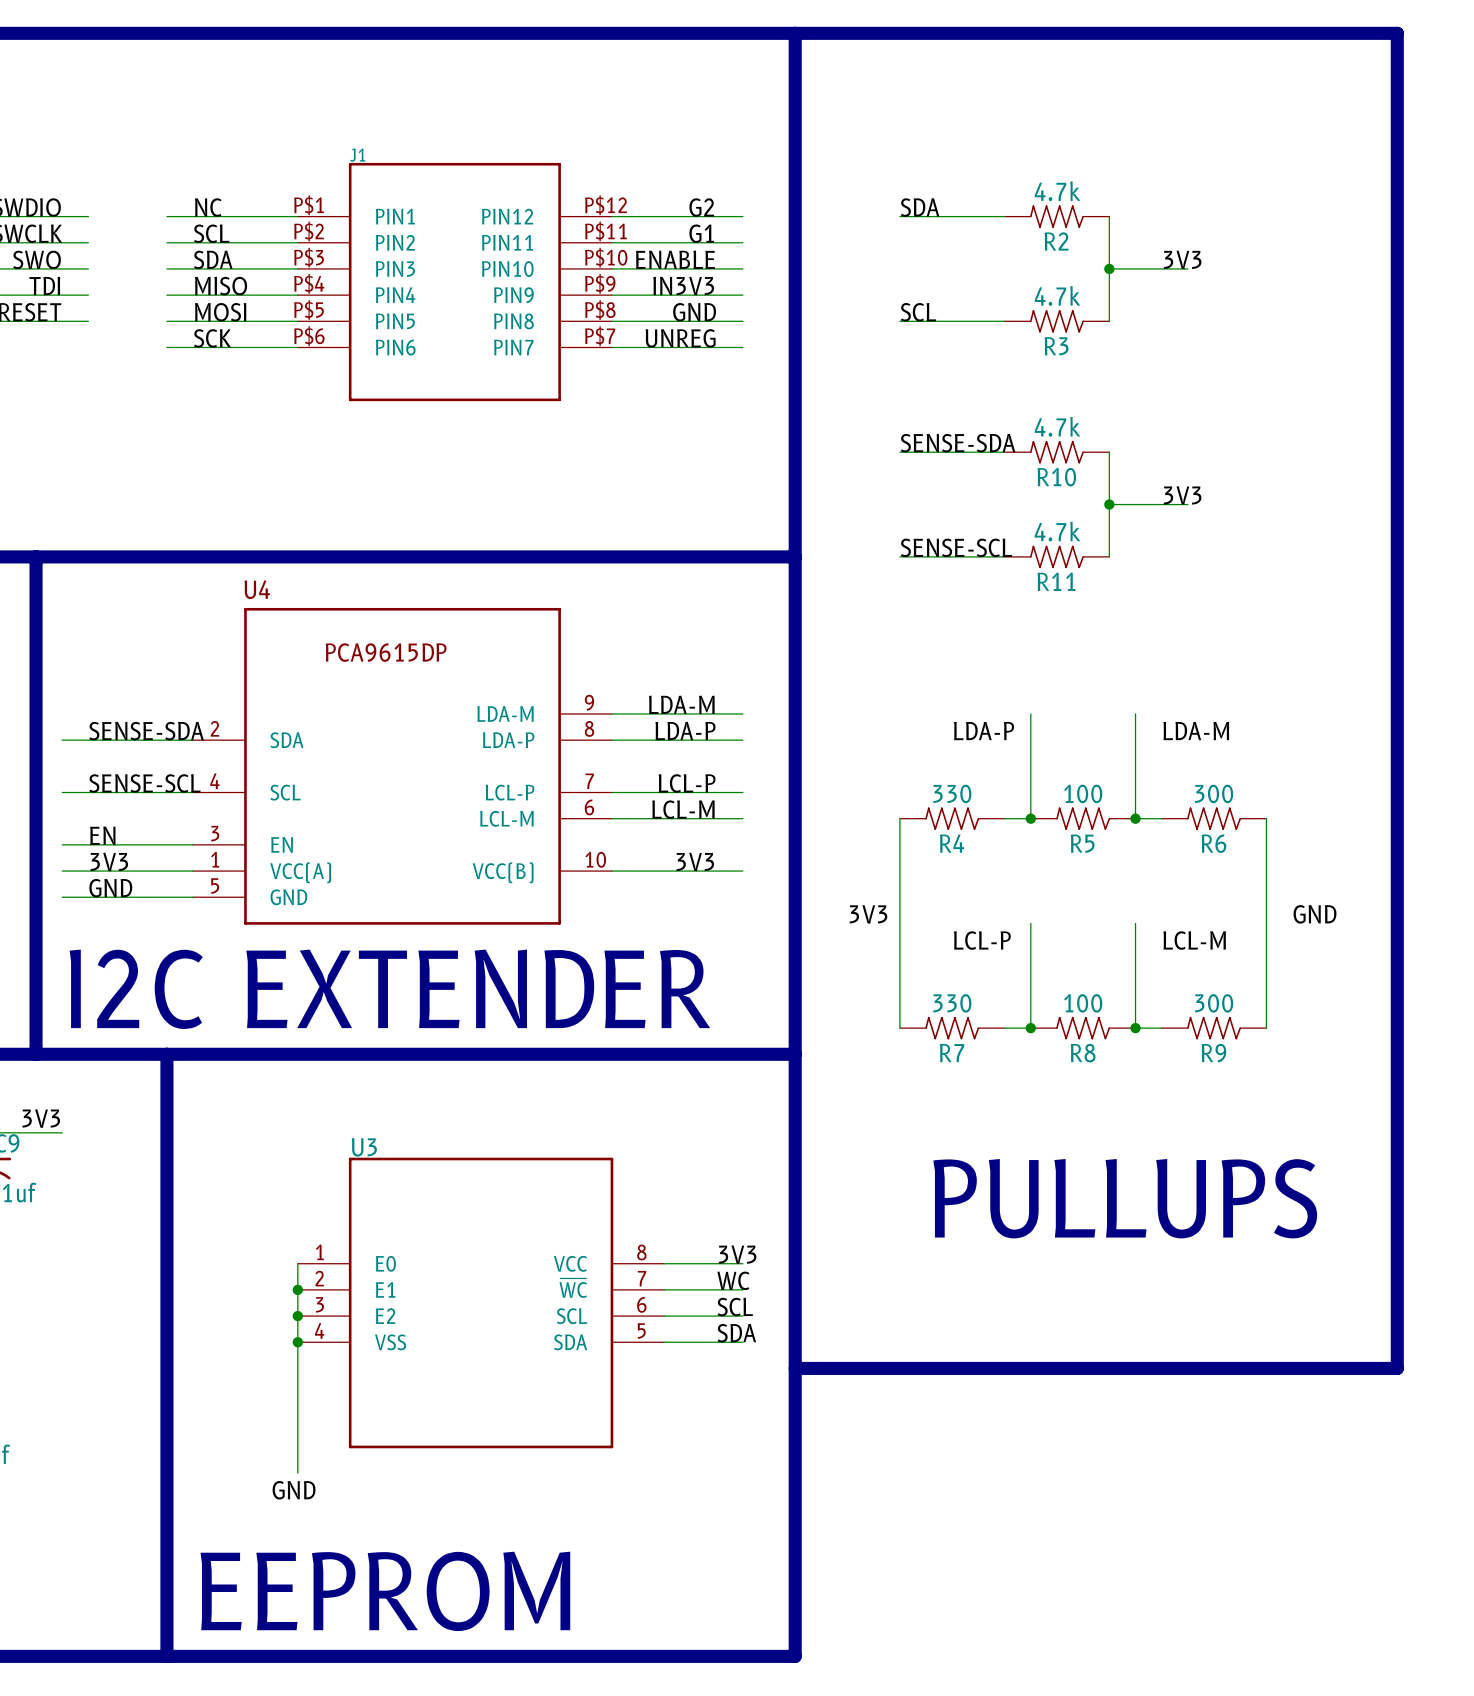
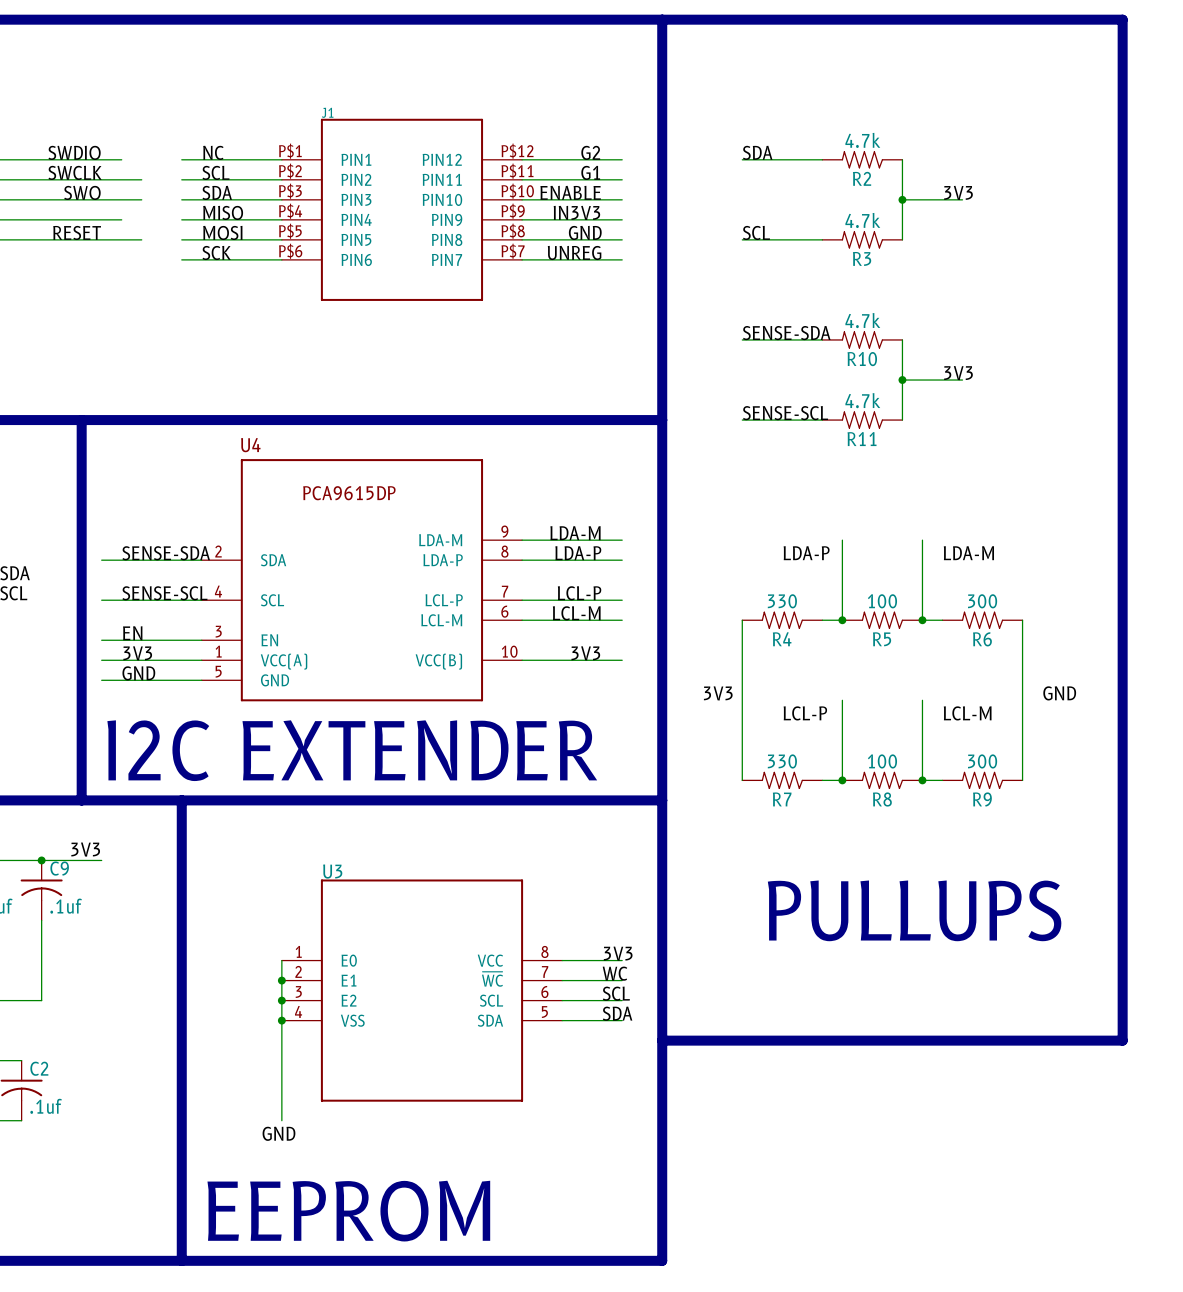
wire: none -> (121, 179) (141, 179)
wire: none -> (121, 199) (141, 199)
label: TDI (44, 285) -> none
wire: none -> (121, 239) (141, 239)

